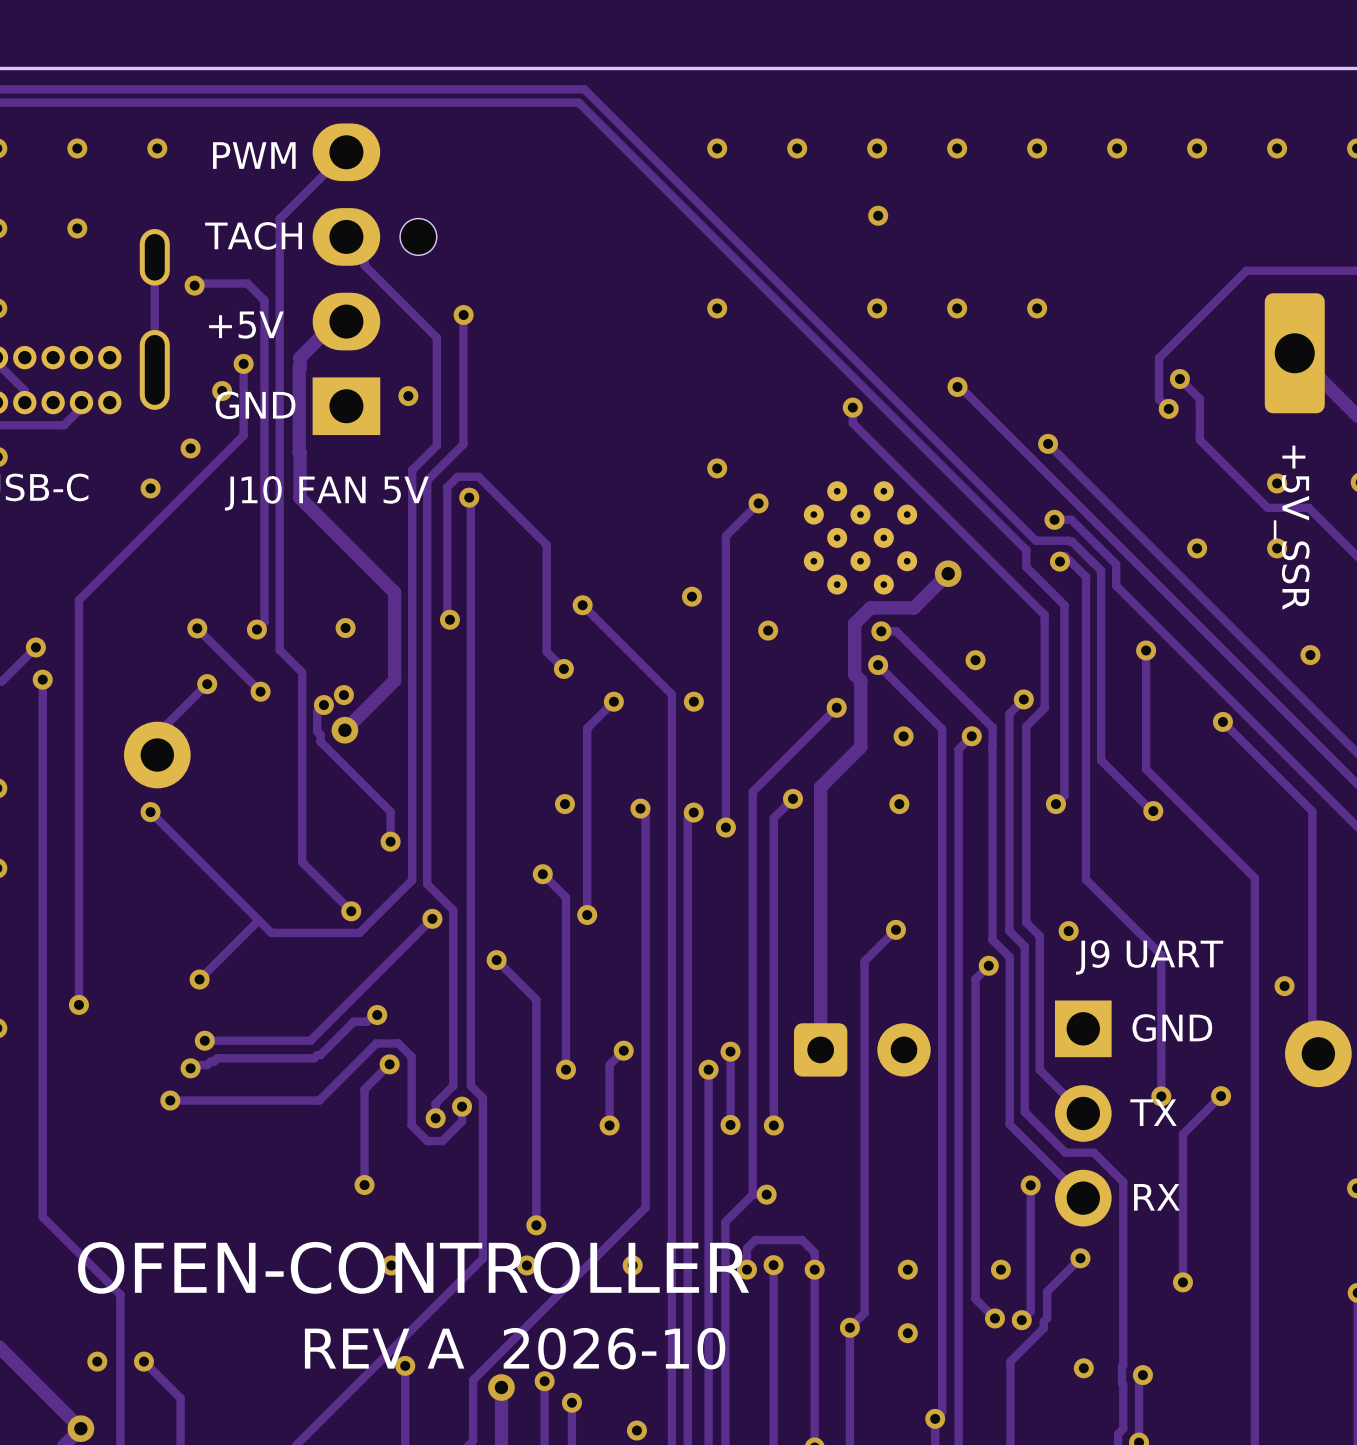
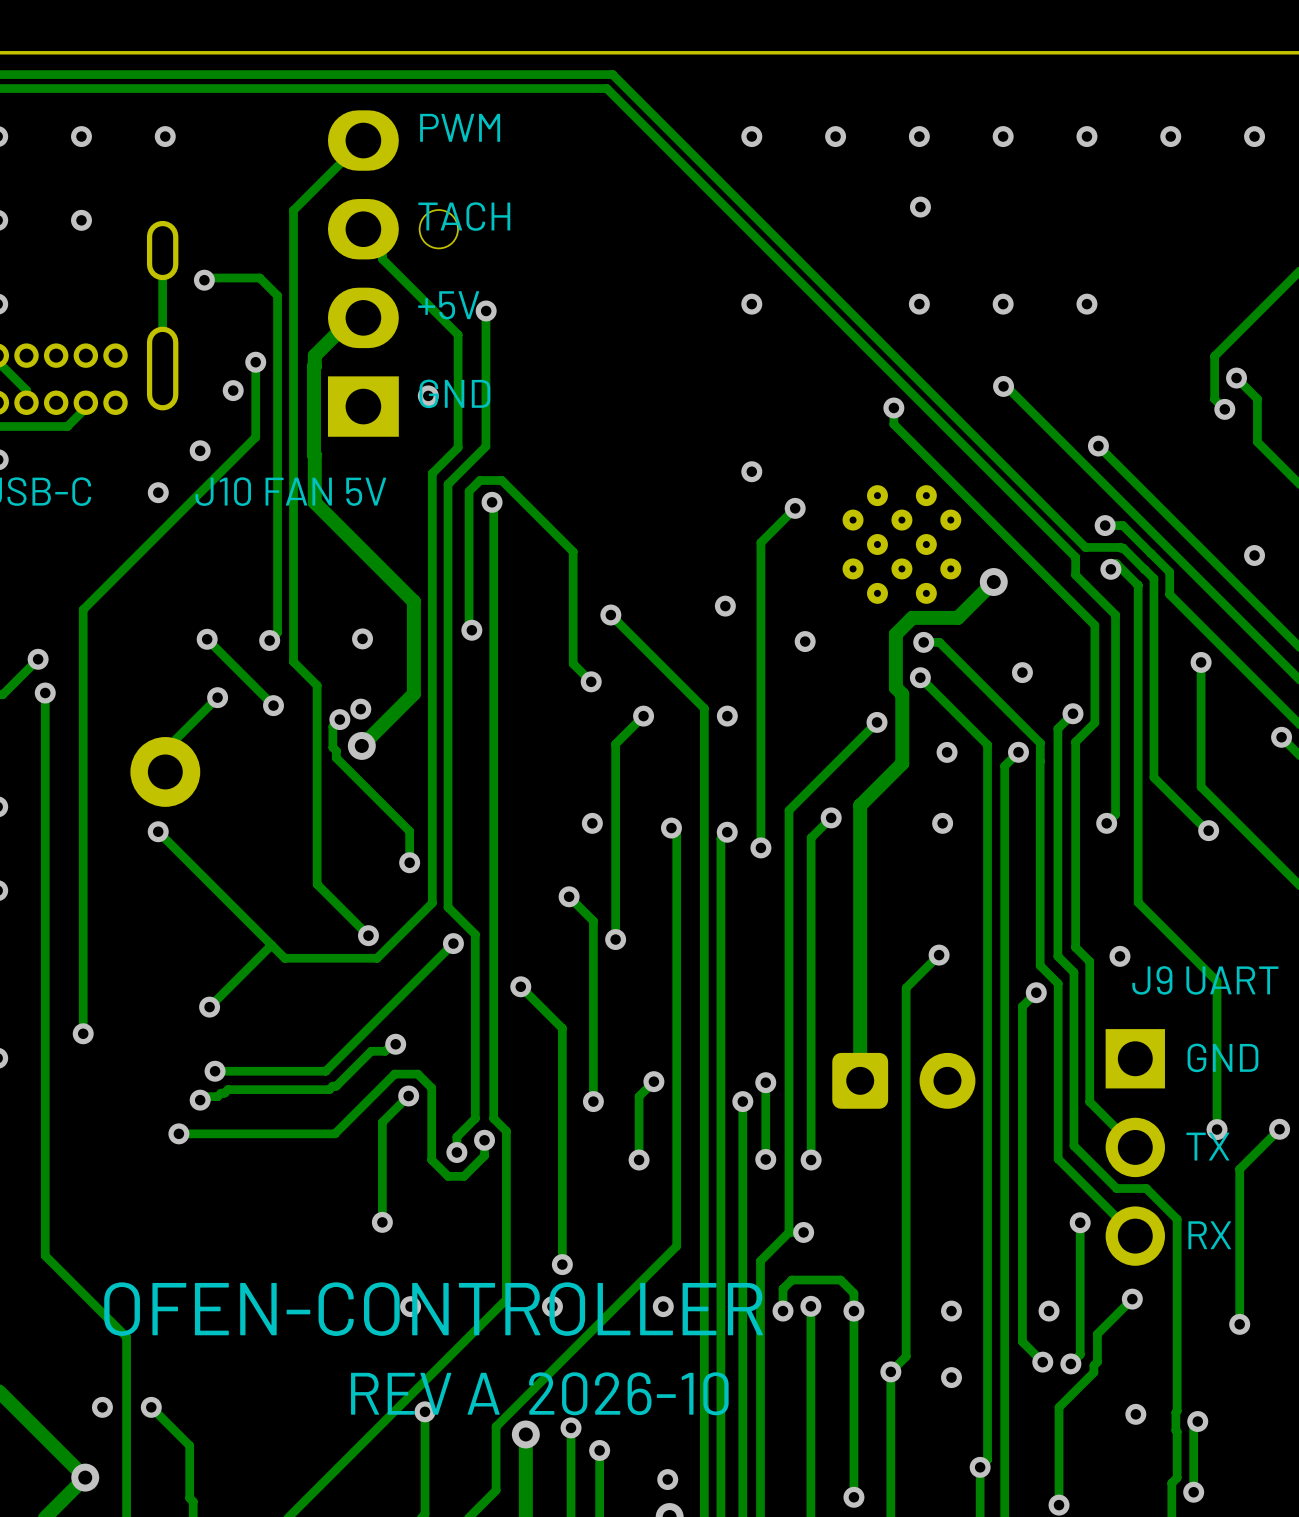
text position: PWM (254, 155) -> PWM (460, 127)
text position: TACH (253, 235) -> TACH (464, 216)
text position: +5V (246, 325) -> +5V (448, 305)
text position: GND (255, 405) -> GND (454, 393)
text position: J10 FAN 5V (326, 493) -> J10 FAN 5V (290, 491)

